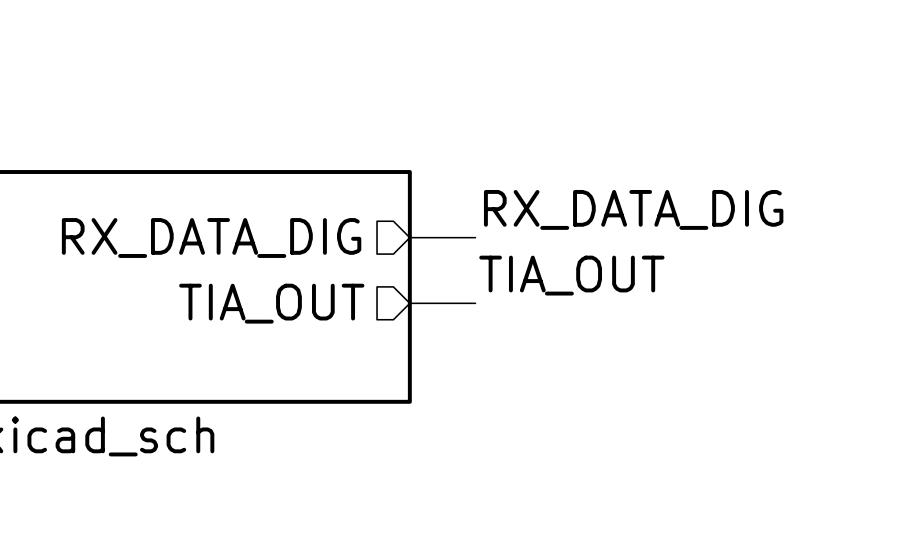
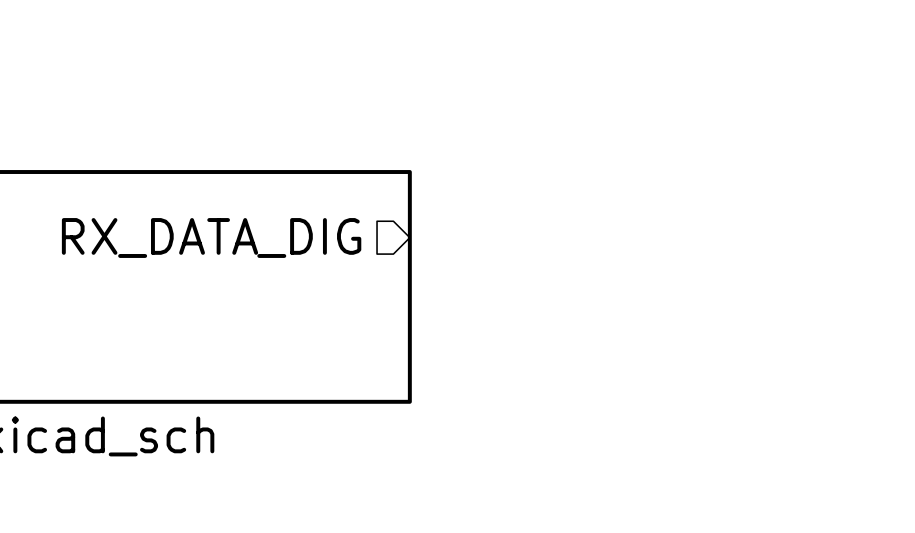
label: RX_DATA_DIG (633, 209) -> none
wire: (409, 237) (475, 237) -> none
label: TIA_OUT (571, 275) -> none
sheet pin: TIA_OUT (271, 303) -> none
wire: (409, 303) (475, 303) -> none

